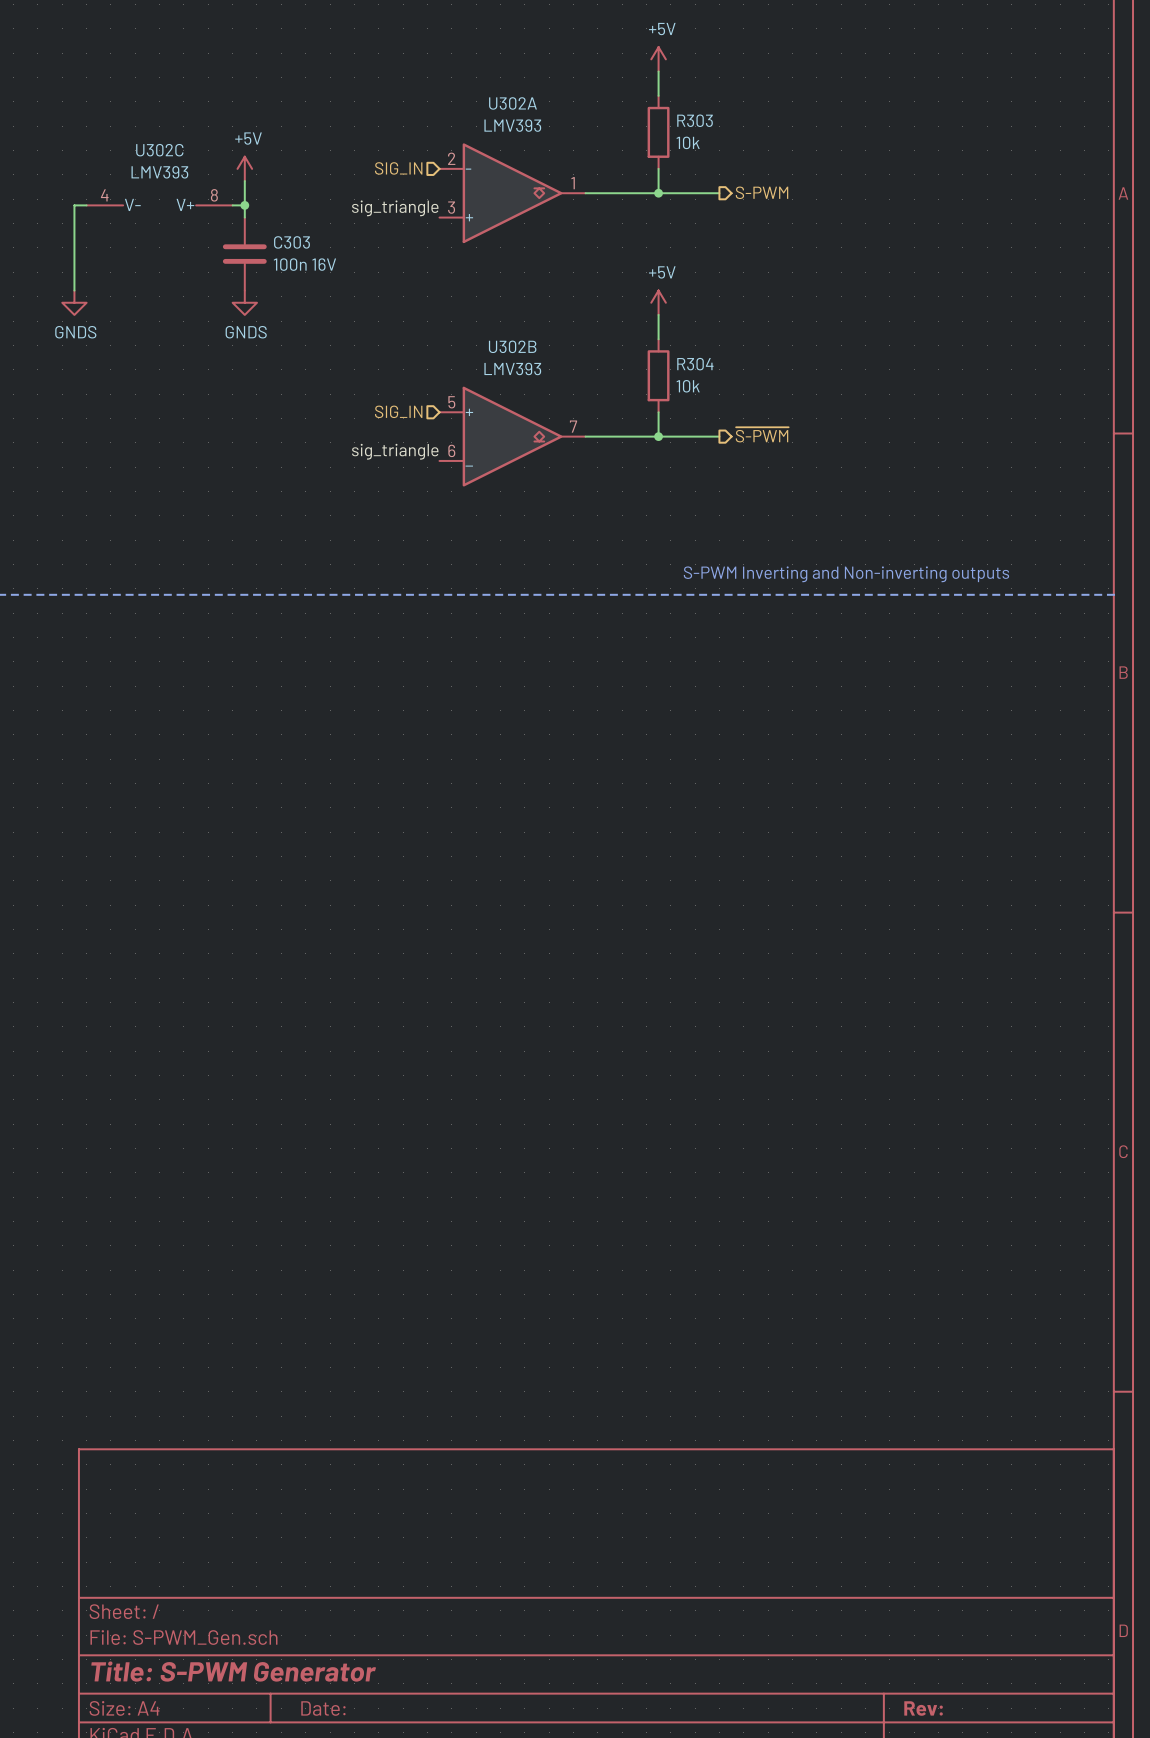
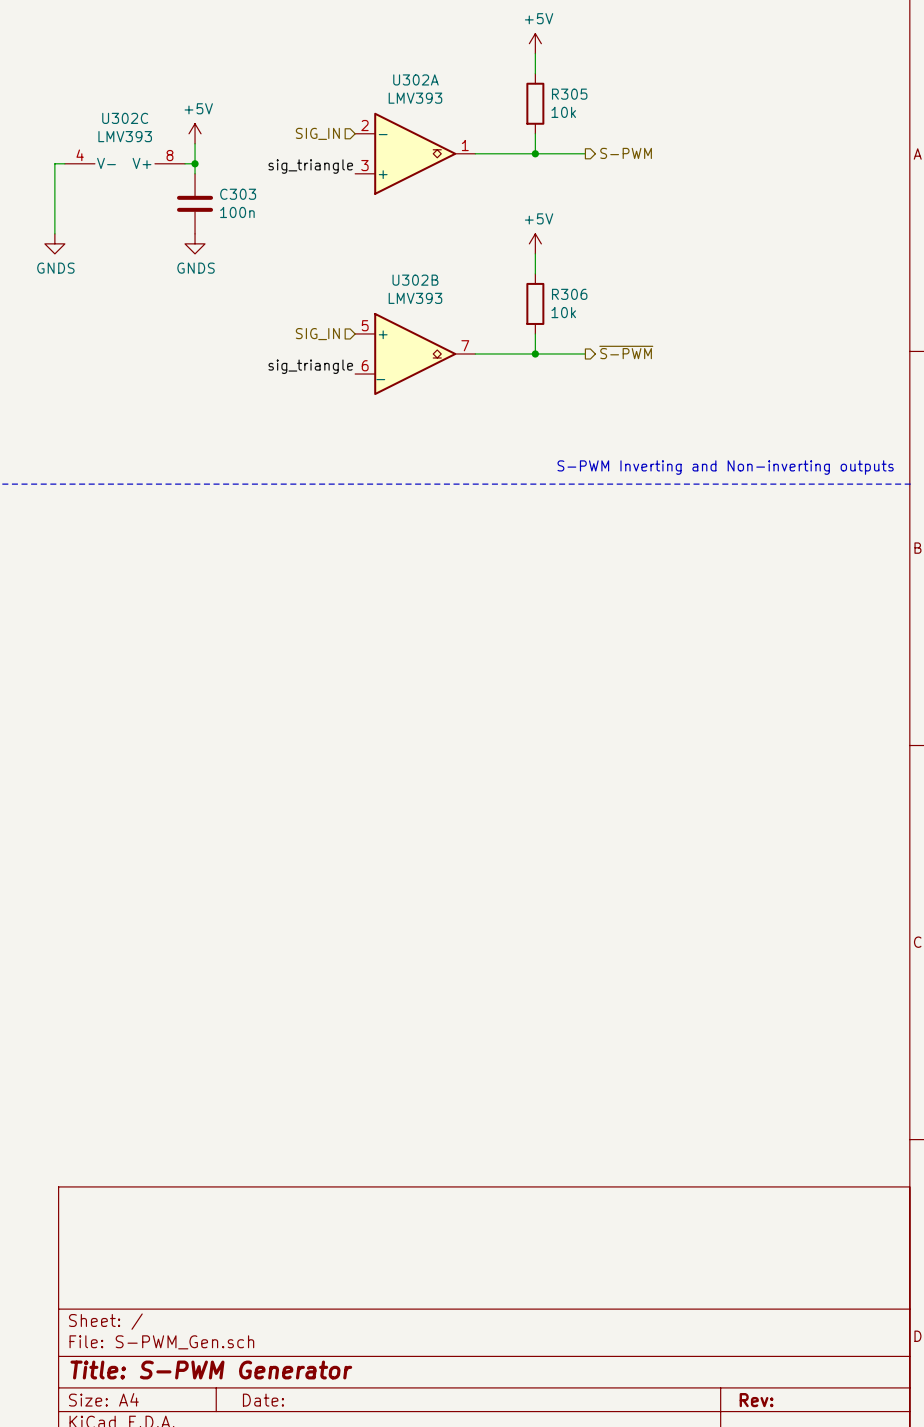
R303 name: R303 (695, 120) -> R305 (569, 94)
C303 value: 100n 16V (304, 264) -> 100n (237, 212)
R304 name: R304 (695, 364) -> R306 (569, 294)

